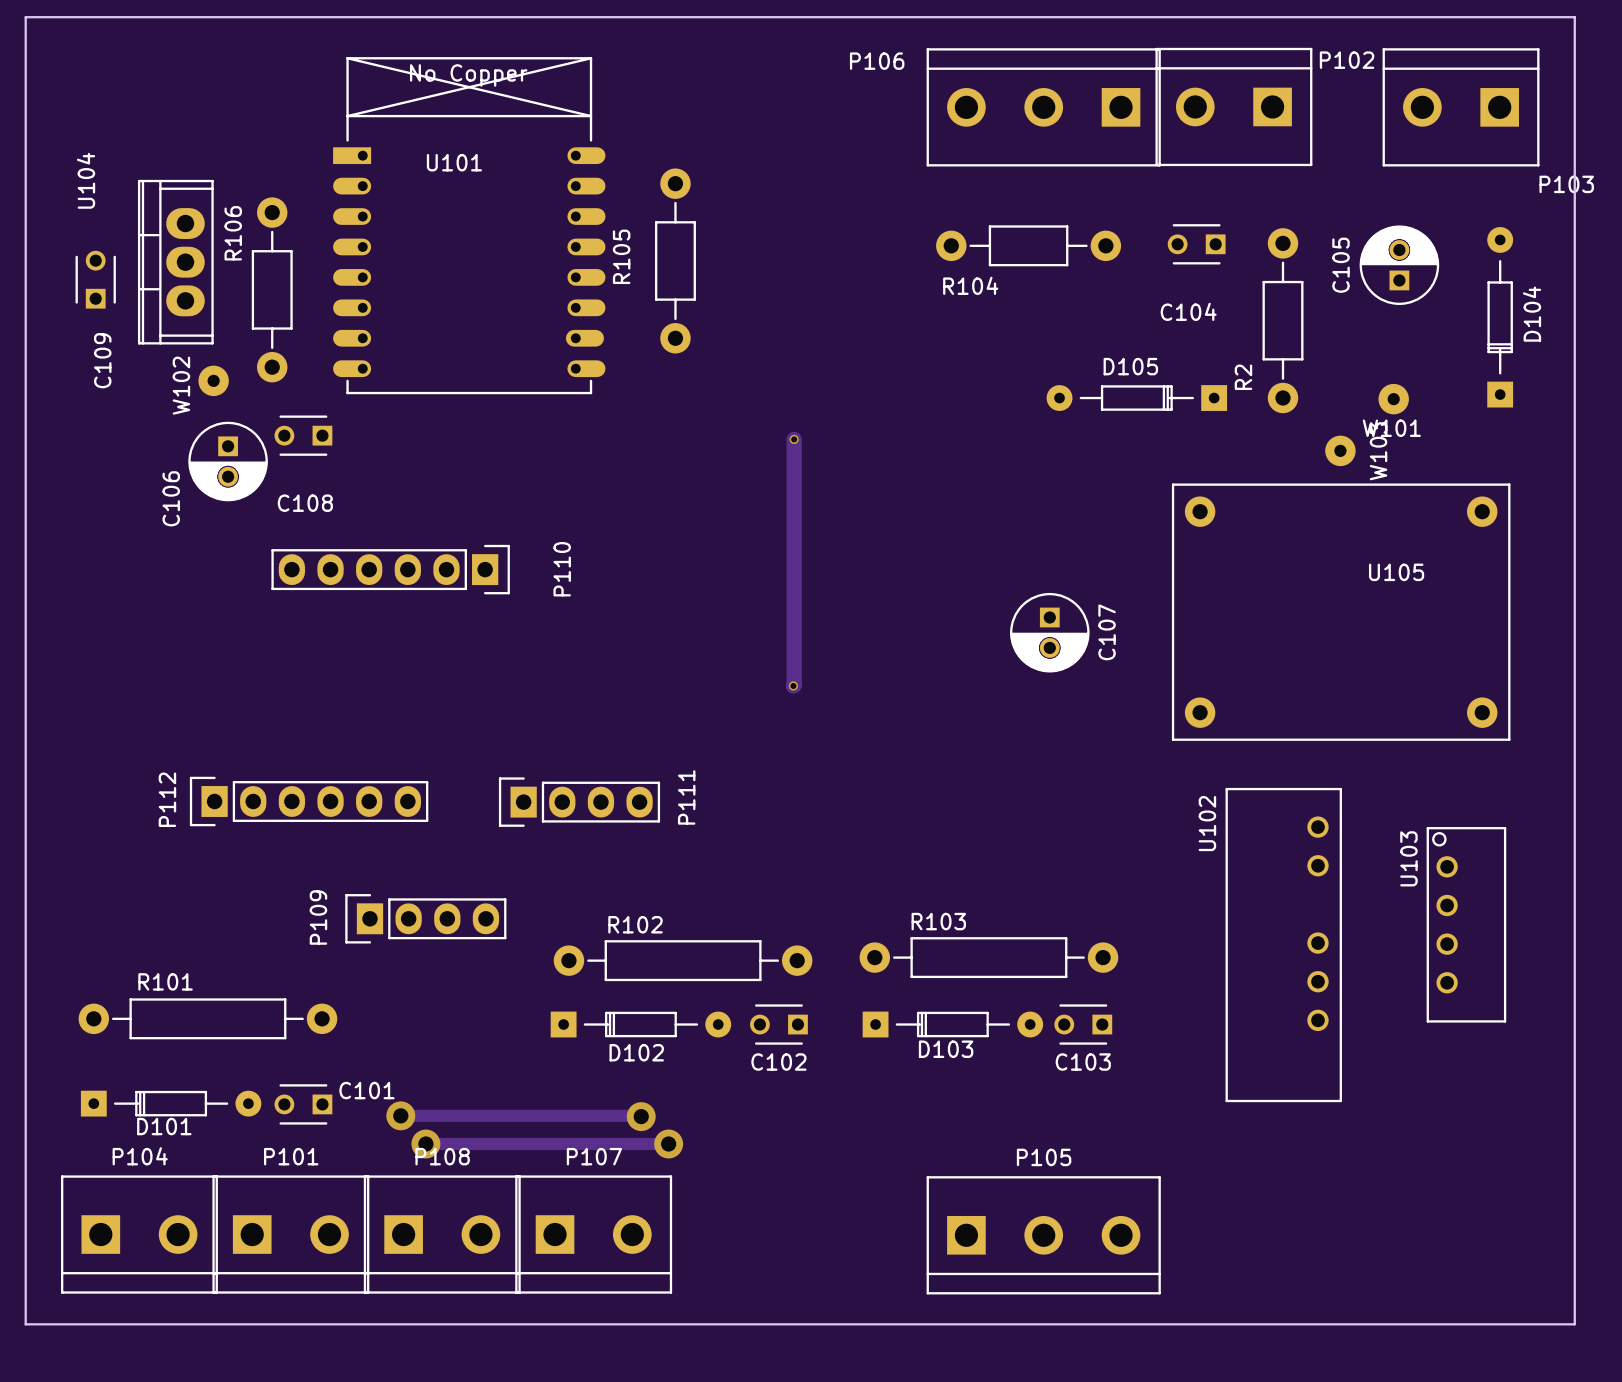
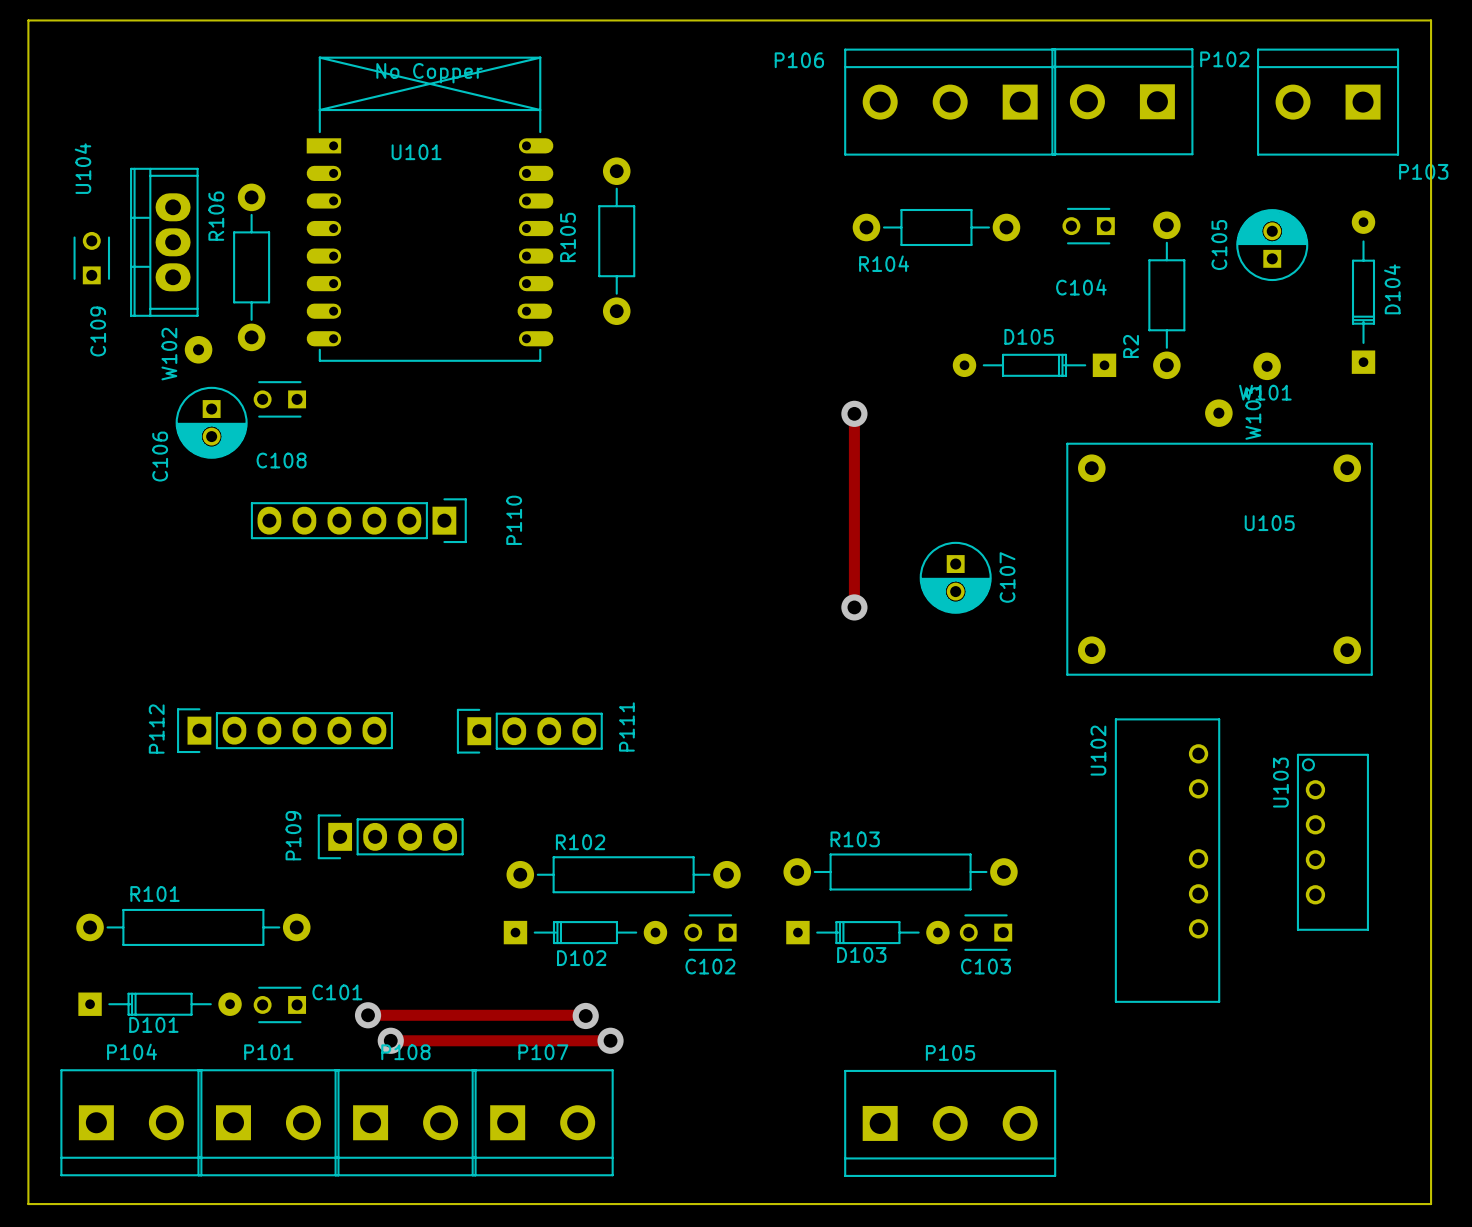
track: (794, 439) (793, 685) -> none
via: (794, 439) -> none
track: none -> (854, 413) (854, 607)
via: none -> (854, 413)
via: none -> (854, 607)
via: (793, 685) -> none

